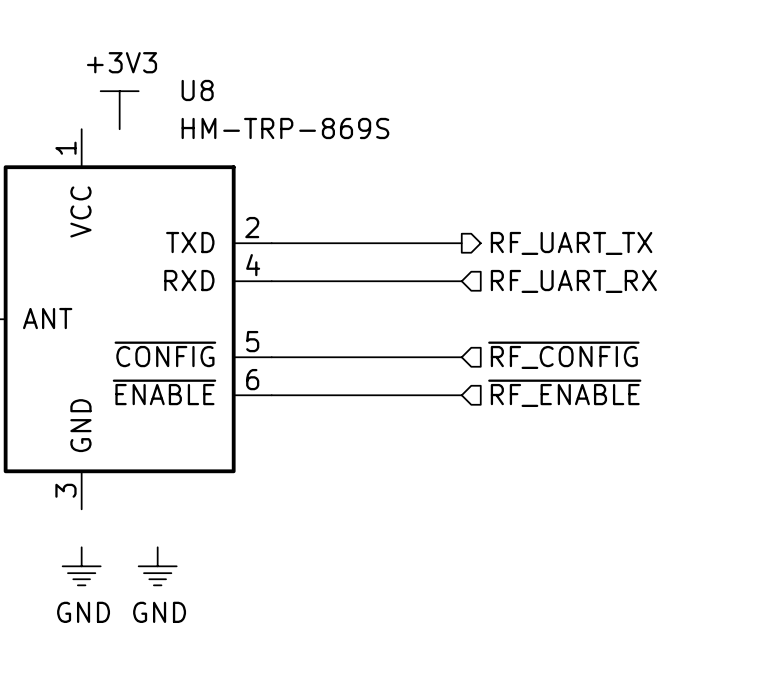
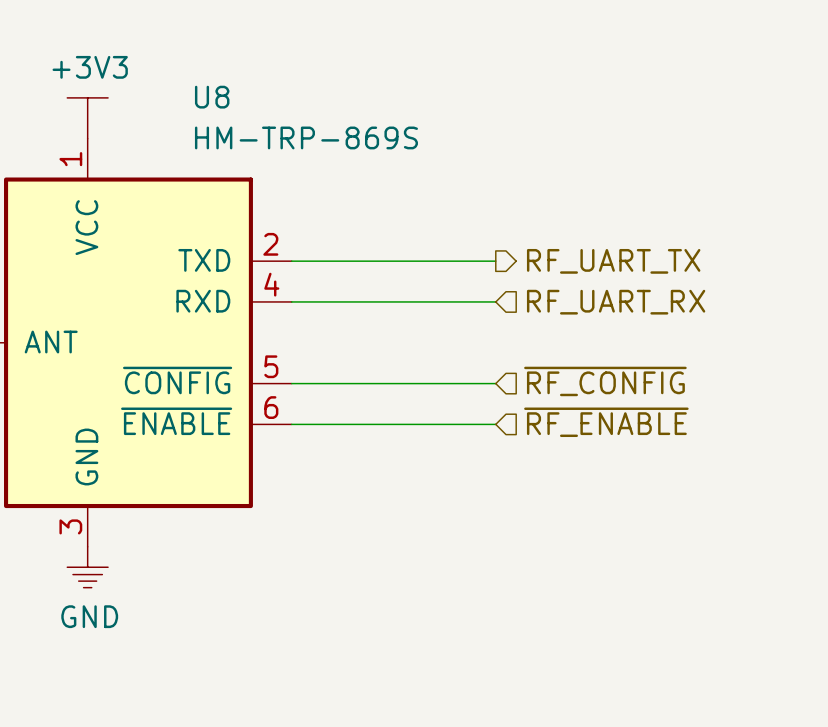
power symbol position: +3V3 (119, 110) -> +3V3 (87, 118)
power symbol position: GND (81, 566) -> GND (87, 567)
power symbol: GND (157, 566) -> none

